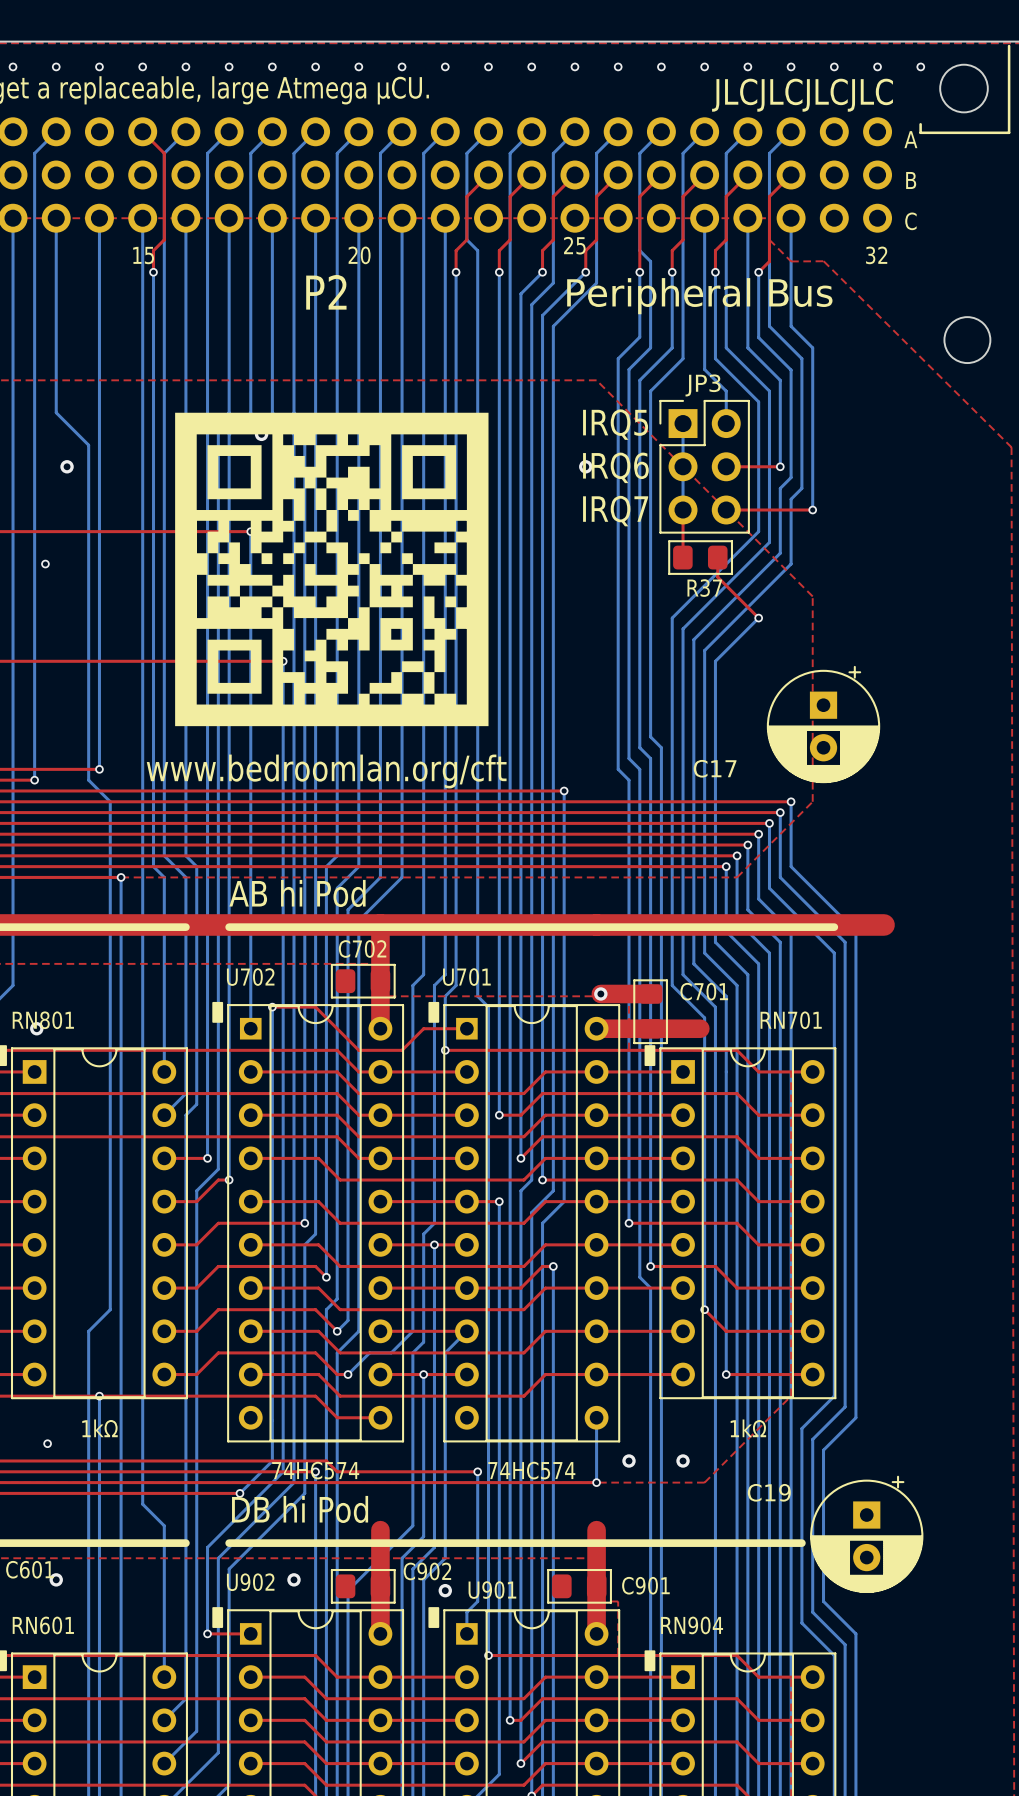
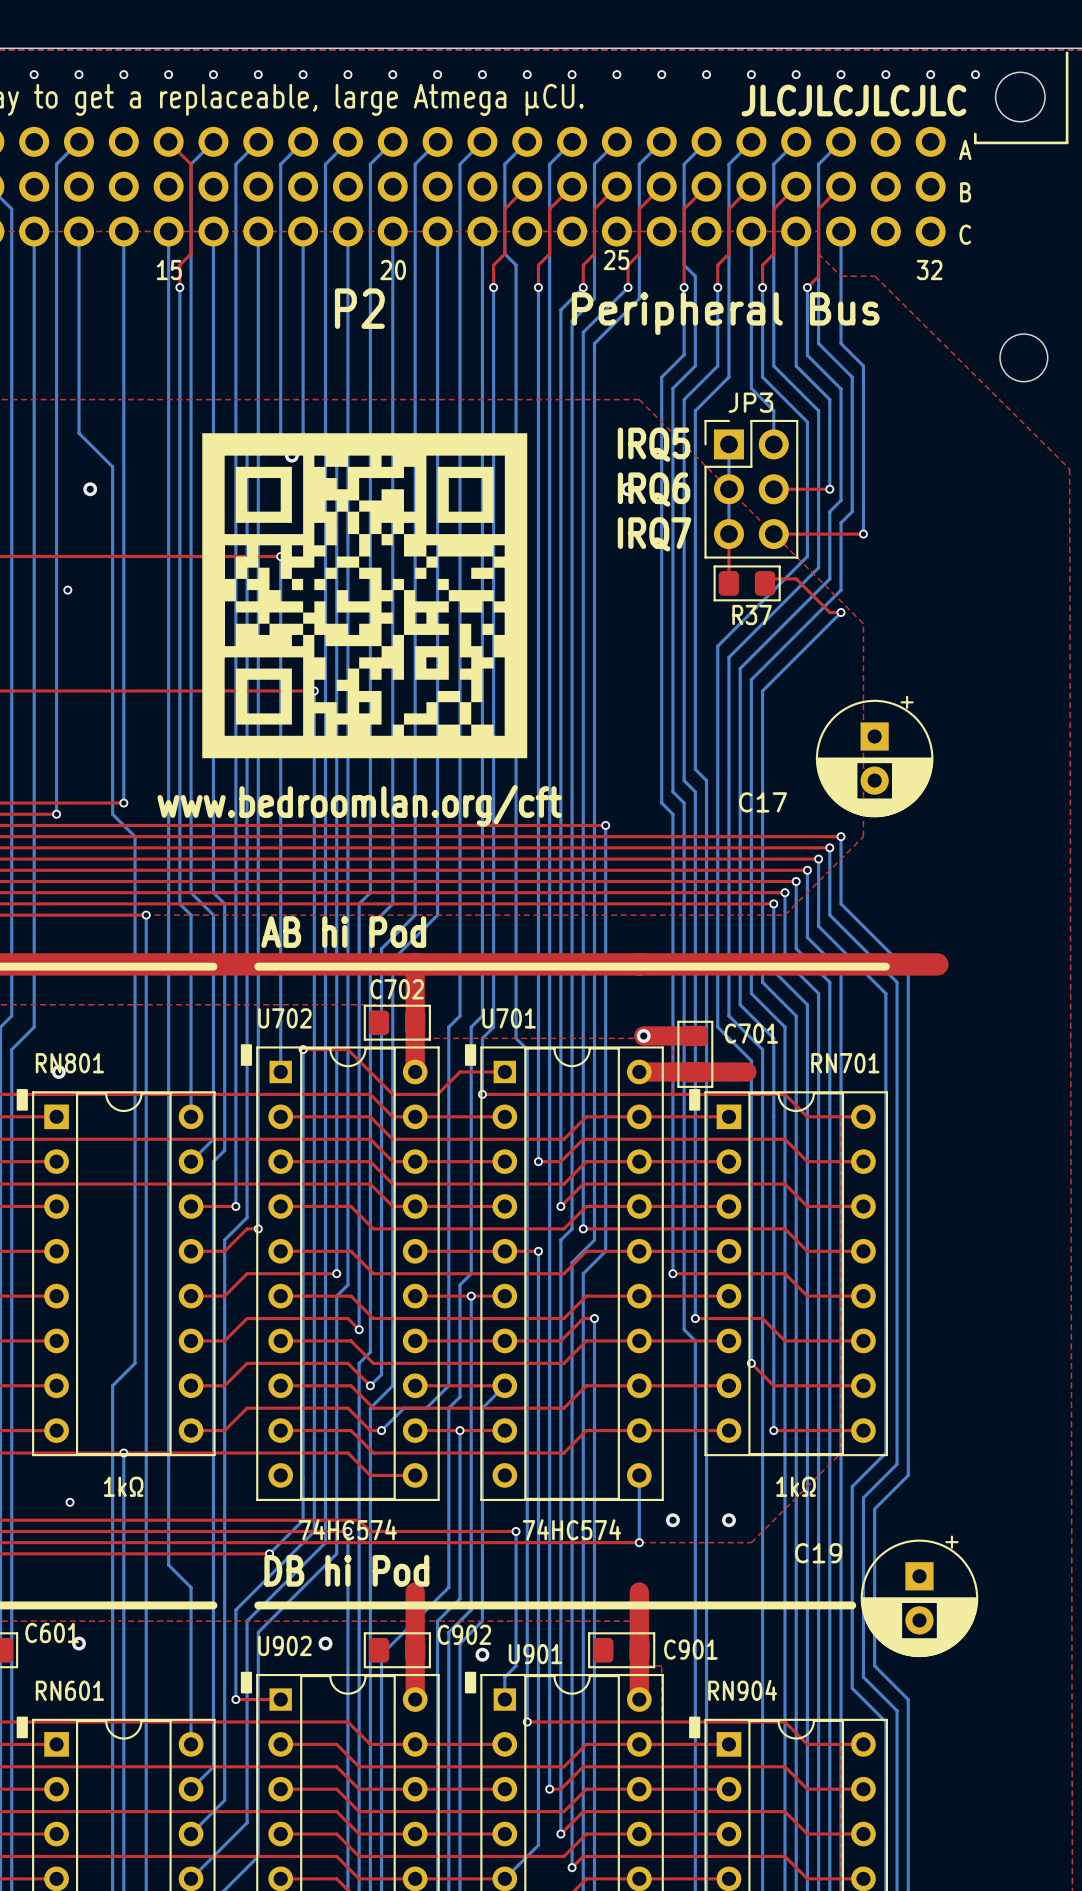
top track: none -> (765, 578) (796, 578) (829, 612) (841, 612)
top track: (717, 557) (717, 577) (758, 618) -> none
bottom track: none -> (841, 612) (807, 646)
via position: (758, 618) -> (841, 612)

